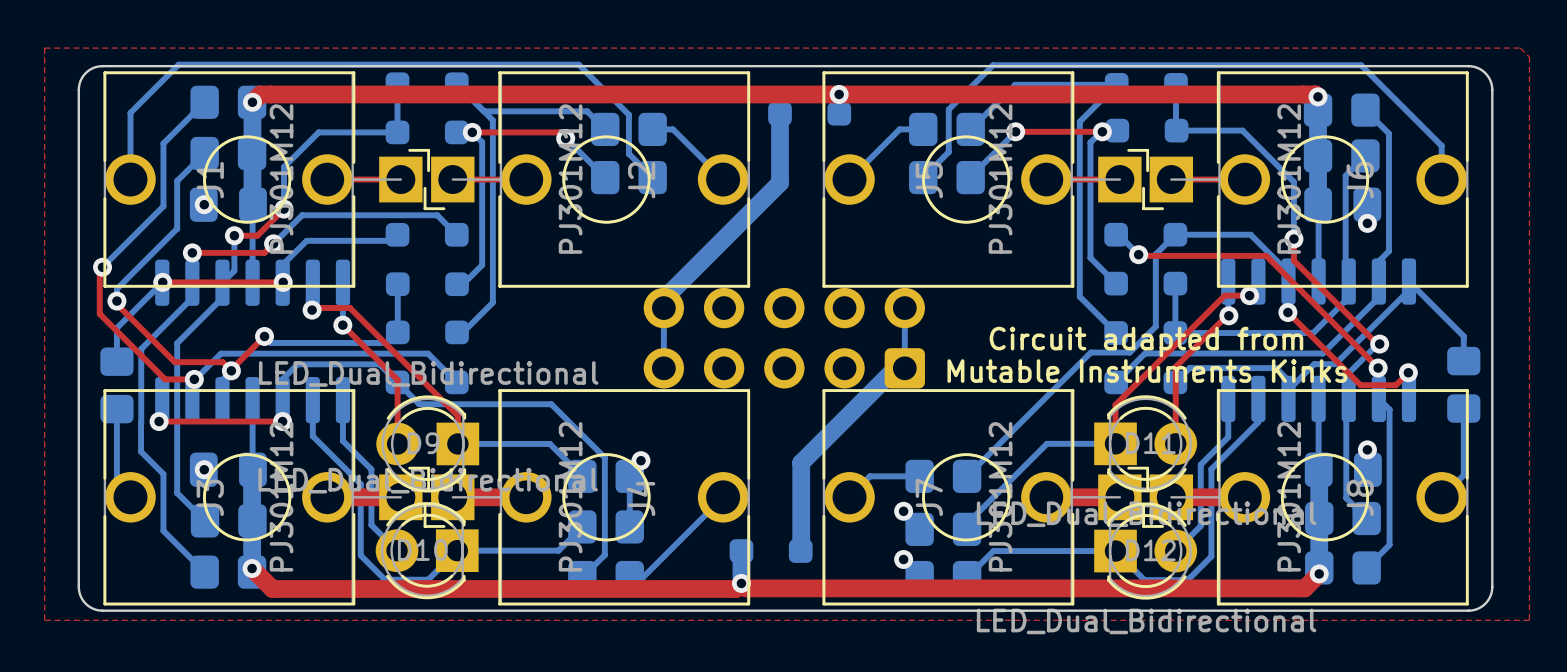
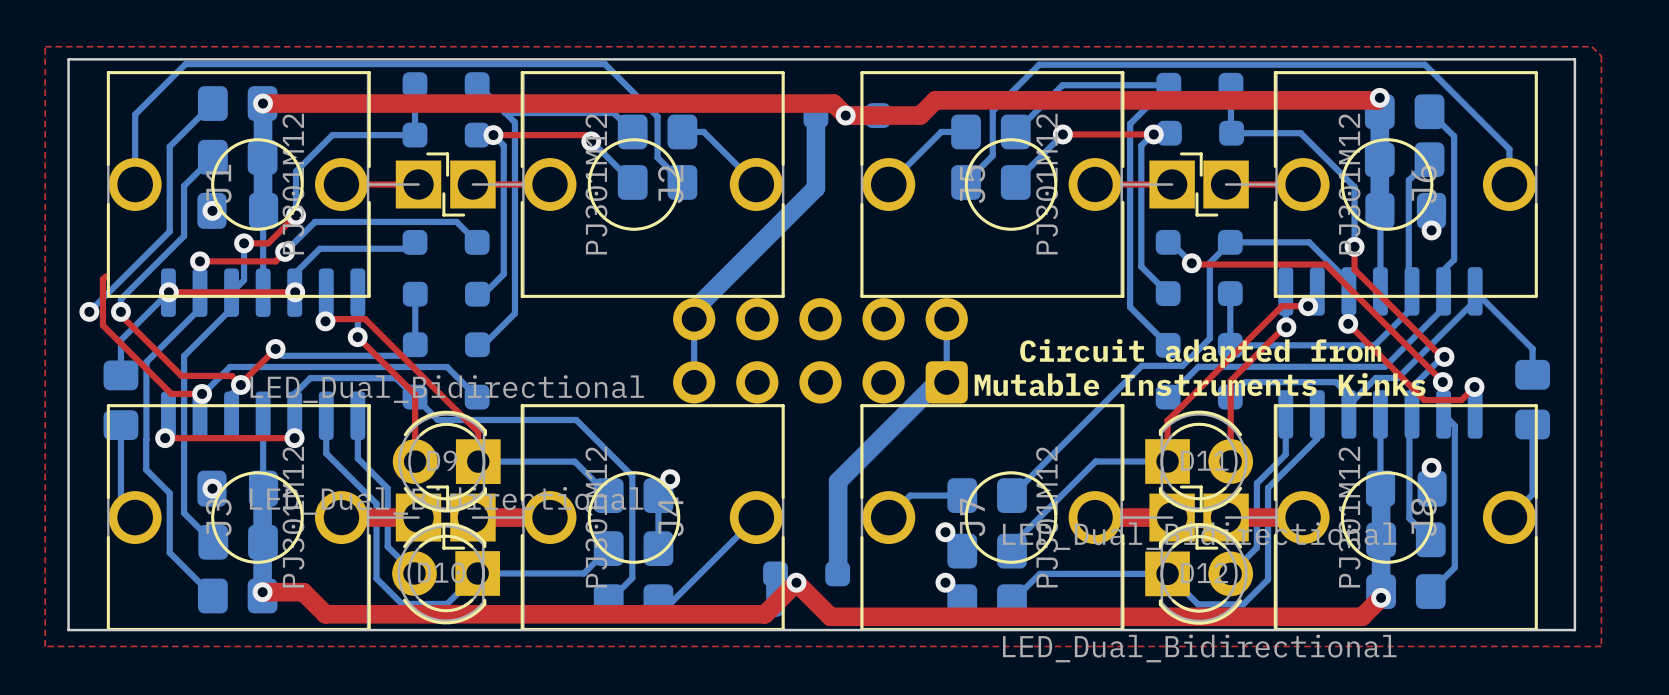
board edge: (102, 66) (1476, 67) (1487, 75) (1492, 89) (1490, 594) (1483, 605) (1468, 610) (94, 609) (82, 599) (78, 586) (78, 89) (80, 82) (85, 73) (94, 67) (102, 66) -> (68, 59) (68, 630) (1574, 630) (1574, 59) (68, 59)
via position: (839, 94) -> (845, 115)
top track: (1318, 96) (1315, 94) (260, 94) (252, 102) -> (1379, 97) (1377, 100) (935, 100) (920, 115) (845, 115) (833, 103) (263, 103)
bottom track: (163, 206) (102, 267) -> (169, 212) (169, 231) (89, 311)
via position: (102, 267) -> (89, 311)
top track: (252, 568) (272, 588) (735, 588) (741, 583) -> none
top track: (741, 583) (746, 588) (1304, 588) -> (262, 592) (303, 592) (325, 614) (764, 614) (796, 582) (830, 616) (1362, 616) (1365, 613)
via position: (741, 583) -> (796, 582)

